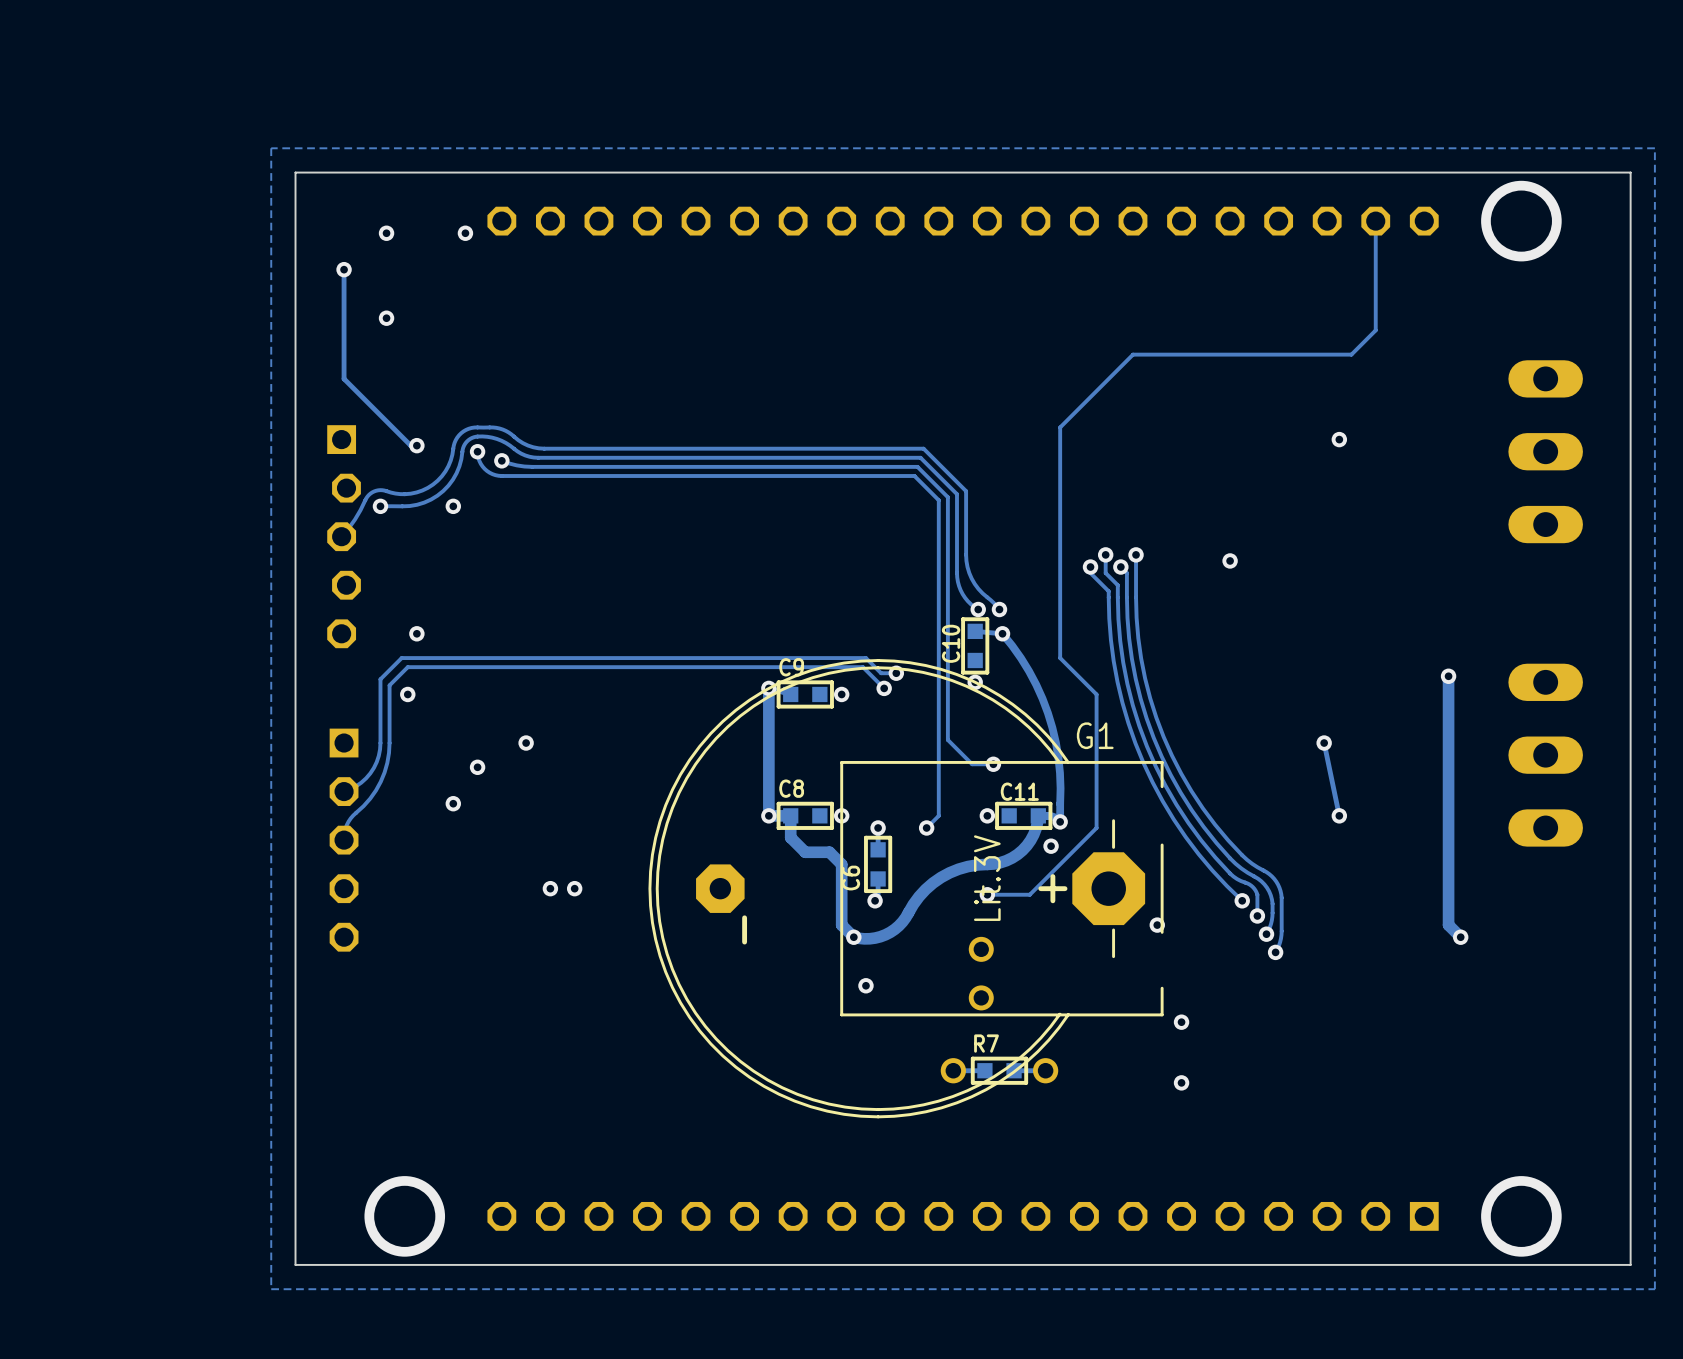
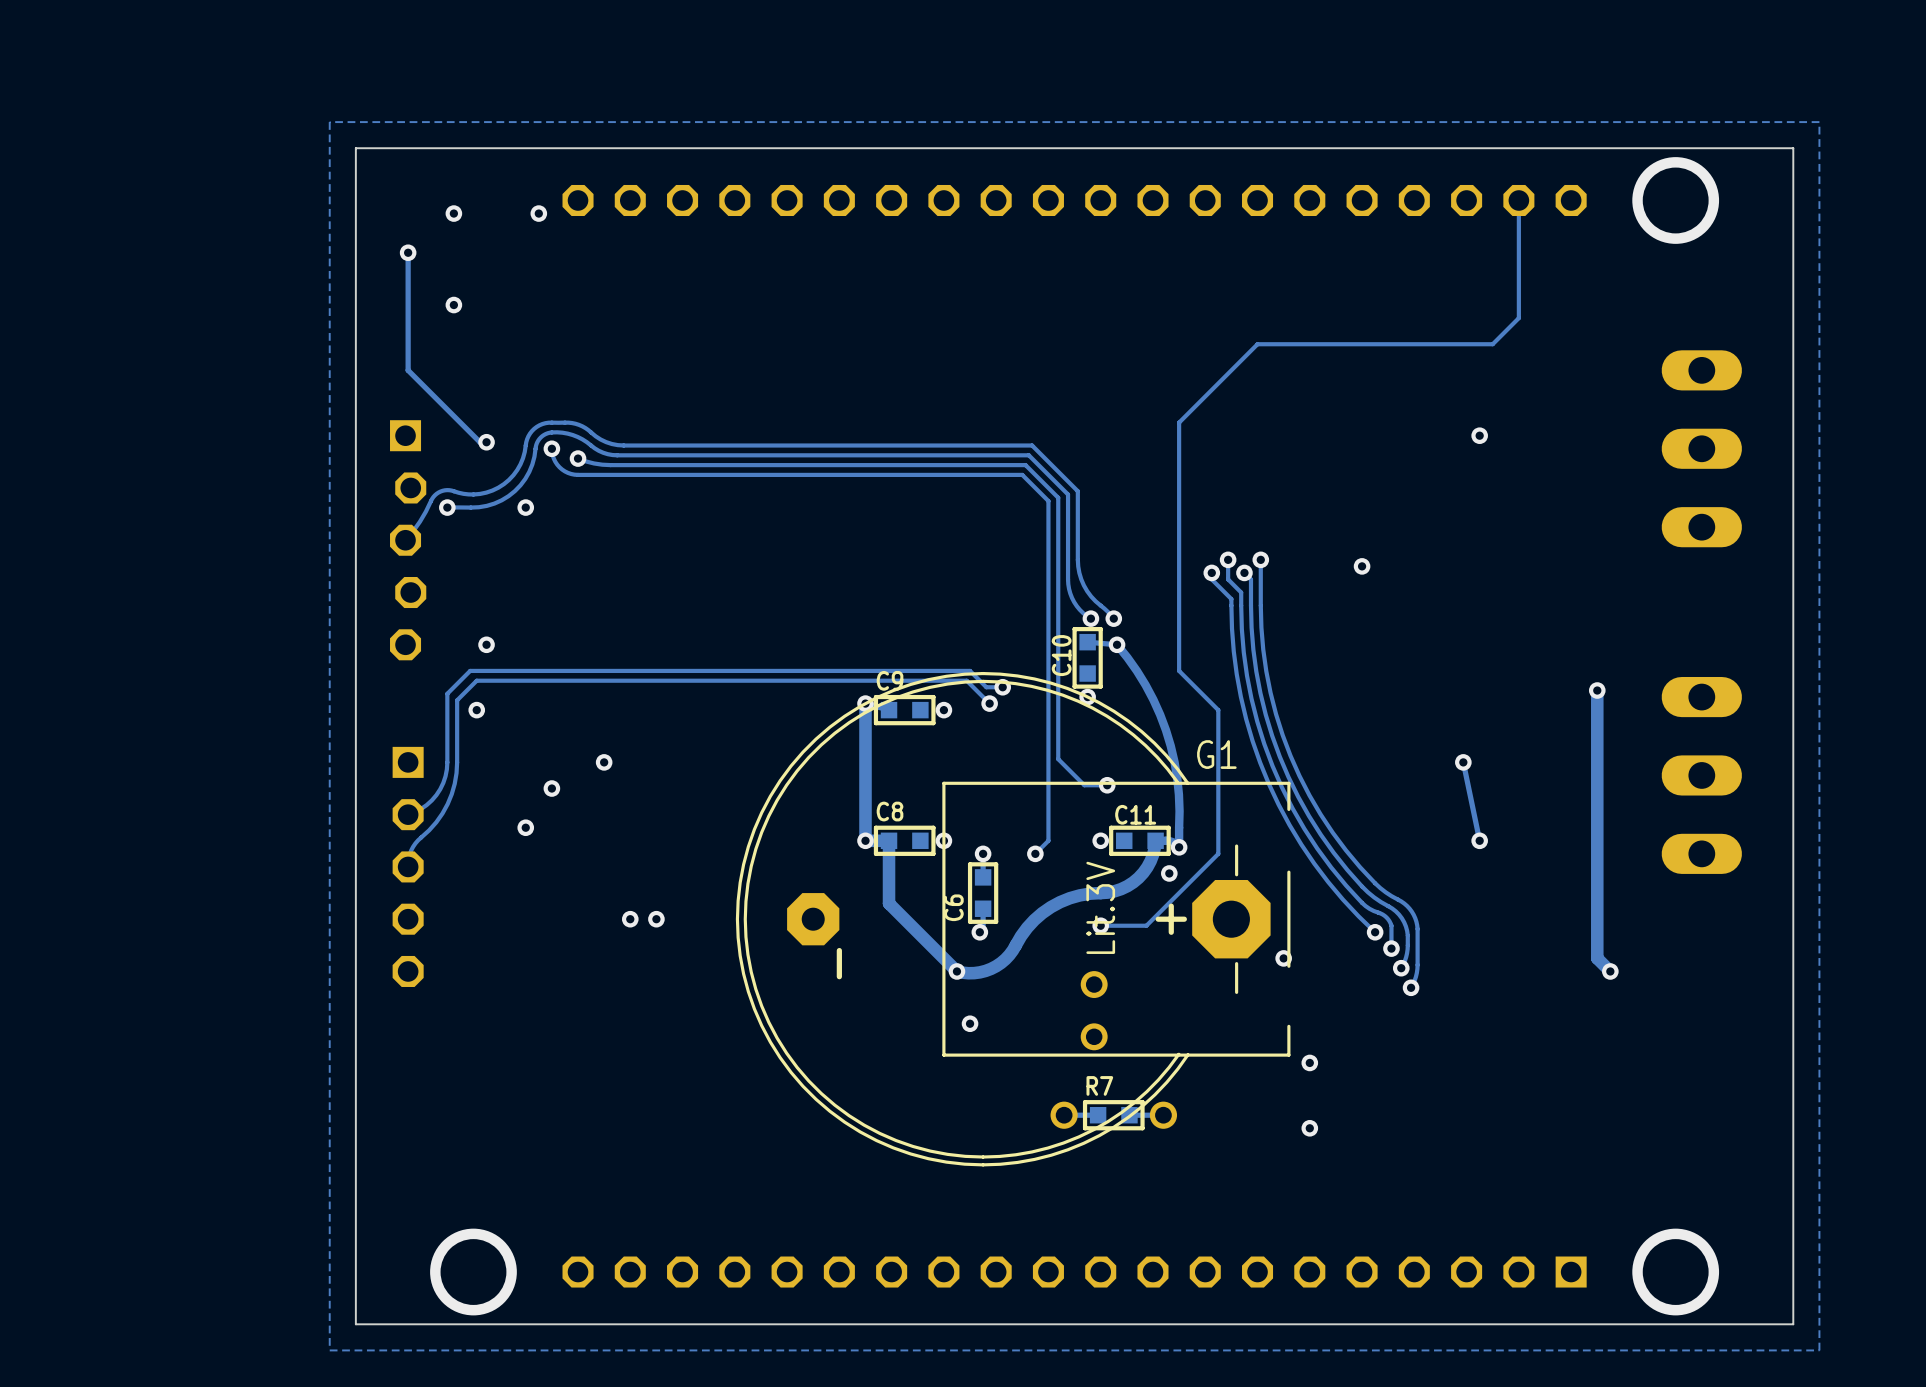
track: (790, 837) (805, 852) (829, 852) (841, 864) (841, 925) -> (889, 864) (889, 903) (943, 958)

